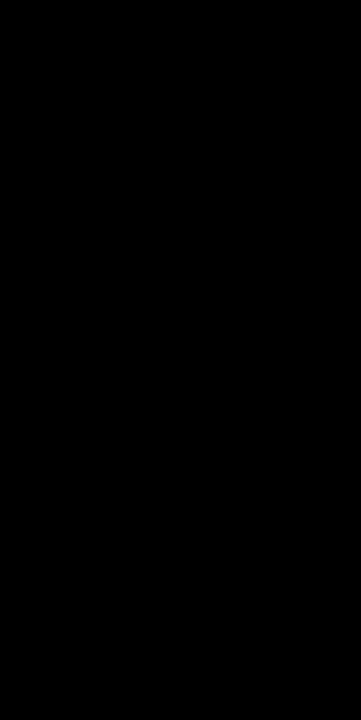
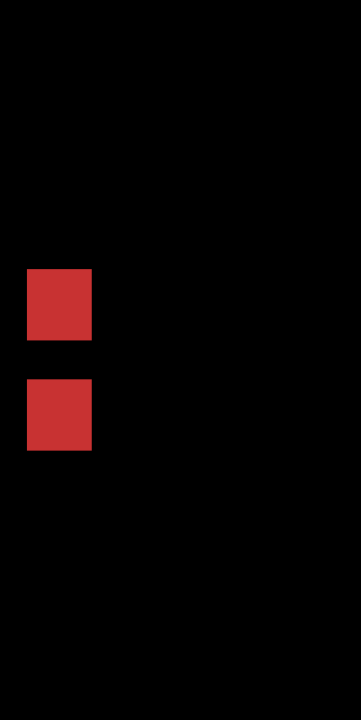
part: none -> (59, 359)

